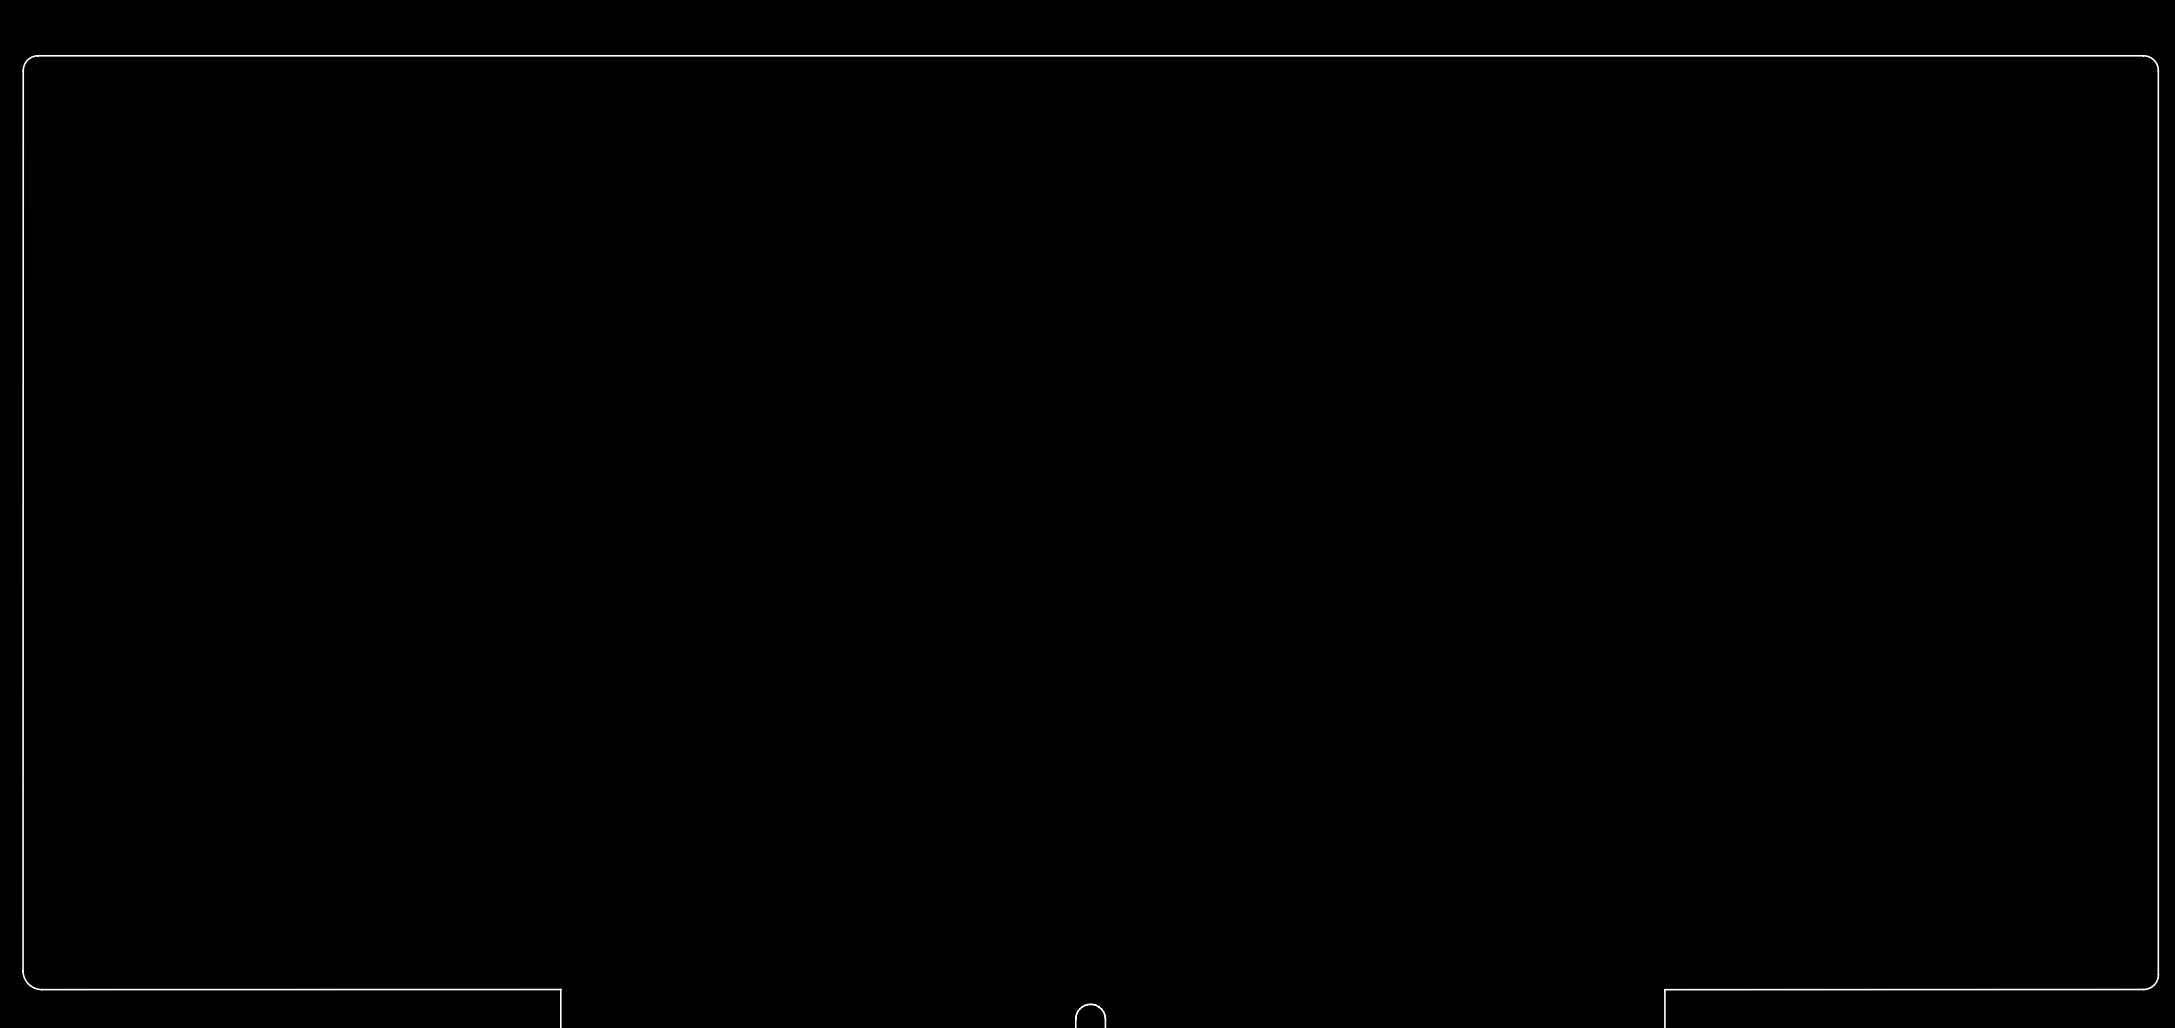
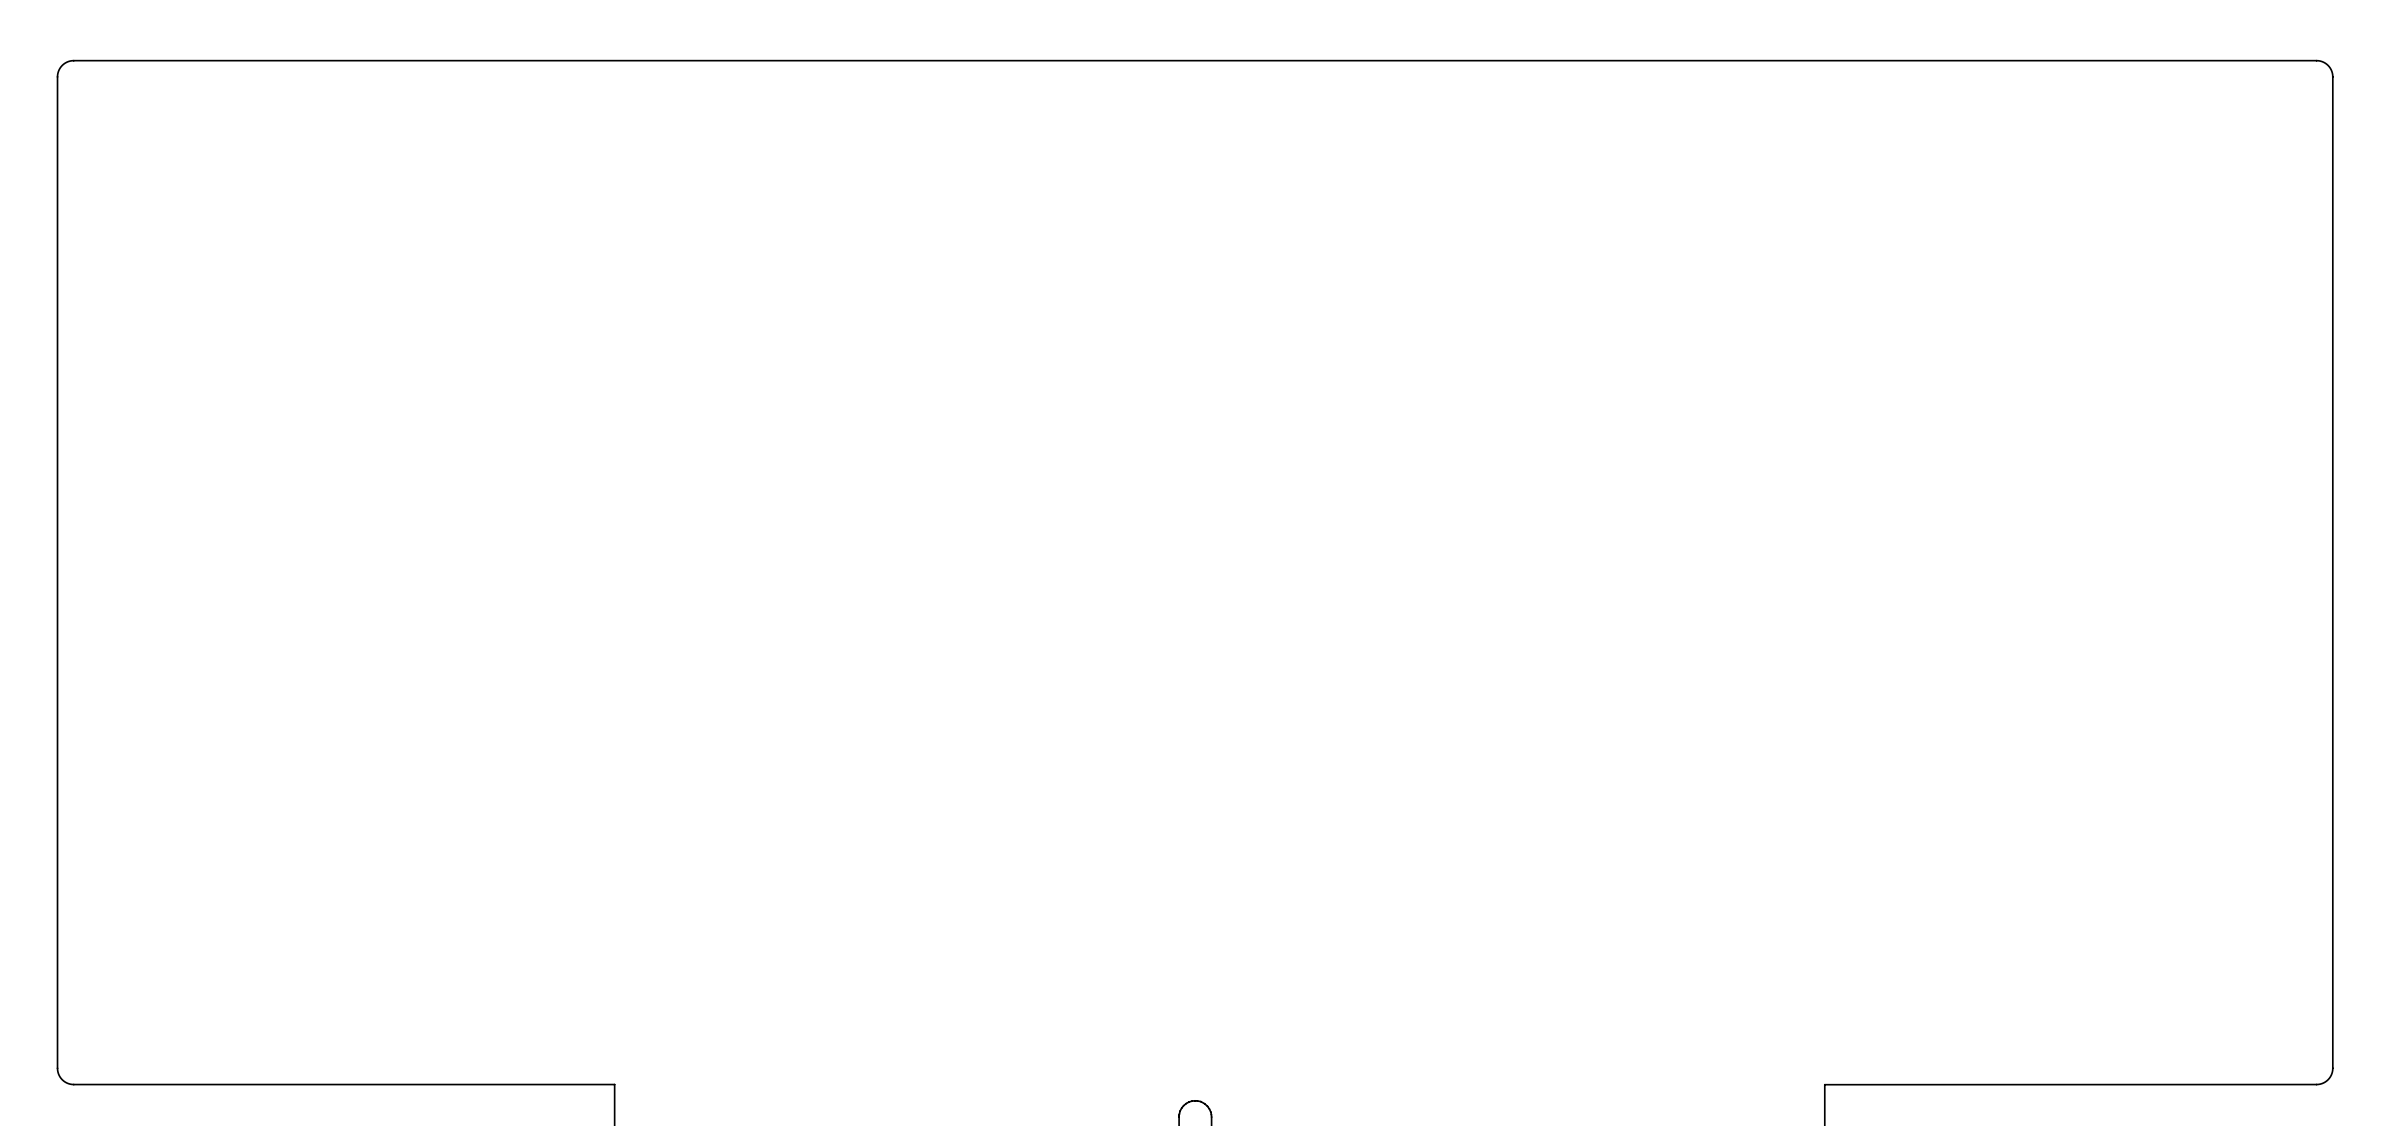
board edge: (2158, 974) (2158, 70) (2156, 62) (2149, 57) (38, 55) (30, 58) (24, 64) (23, 70) (23, 970) (25, 980) (32, 987) (41, 989) (560, 989) -> (2316, 1084) (2328, 1079) (2332, 1068) (2332, 76) (2330, 68) (2323, 62) (2316, 60) (73, 60) (66, 62) (60, 68) (57, 76) (57, 1068) (59, 1075) (65, 1082) (73, 1084) (614, 1084)
board edge: (2158, 974) (2155, 983) (2148, 988) (2113, 989) -> none

